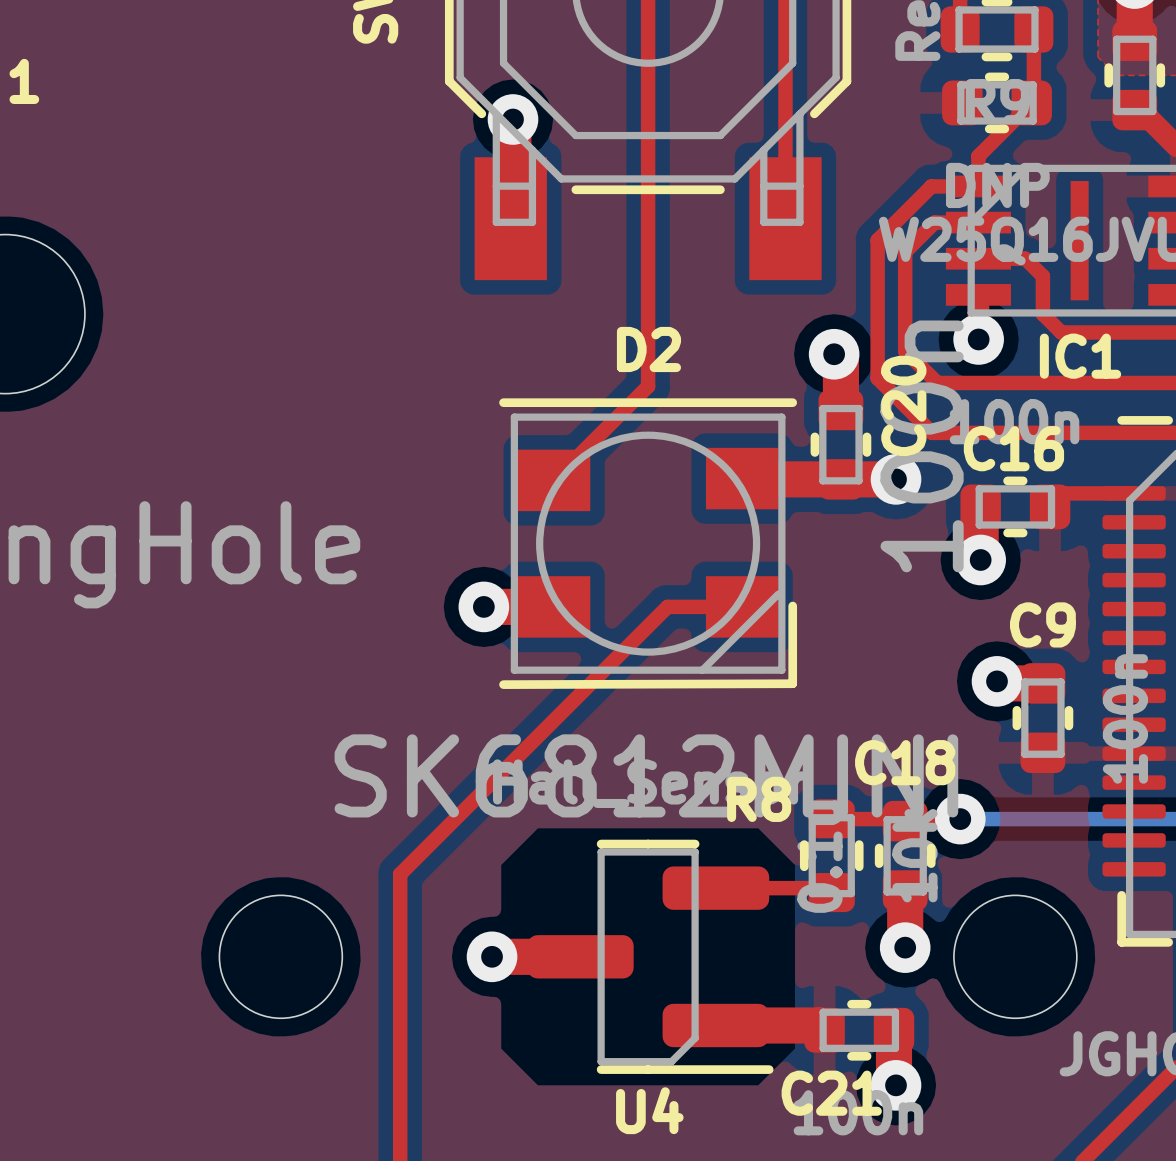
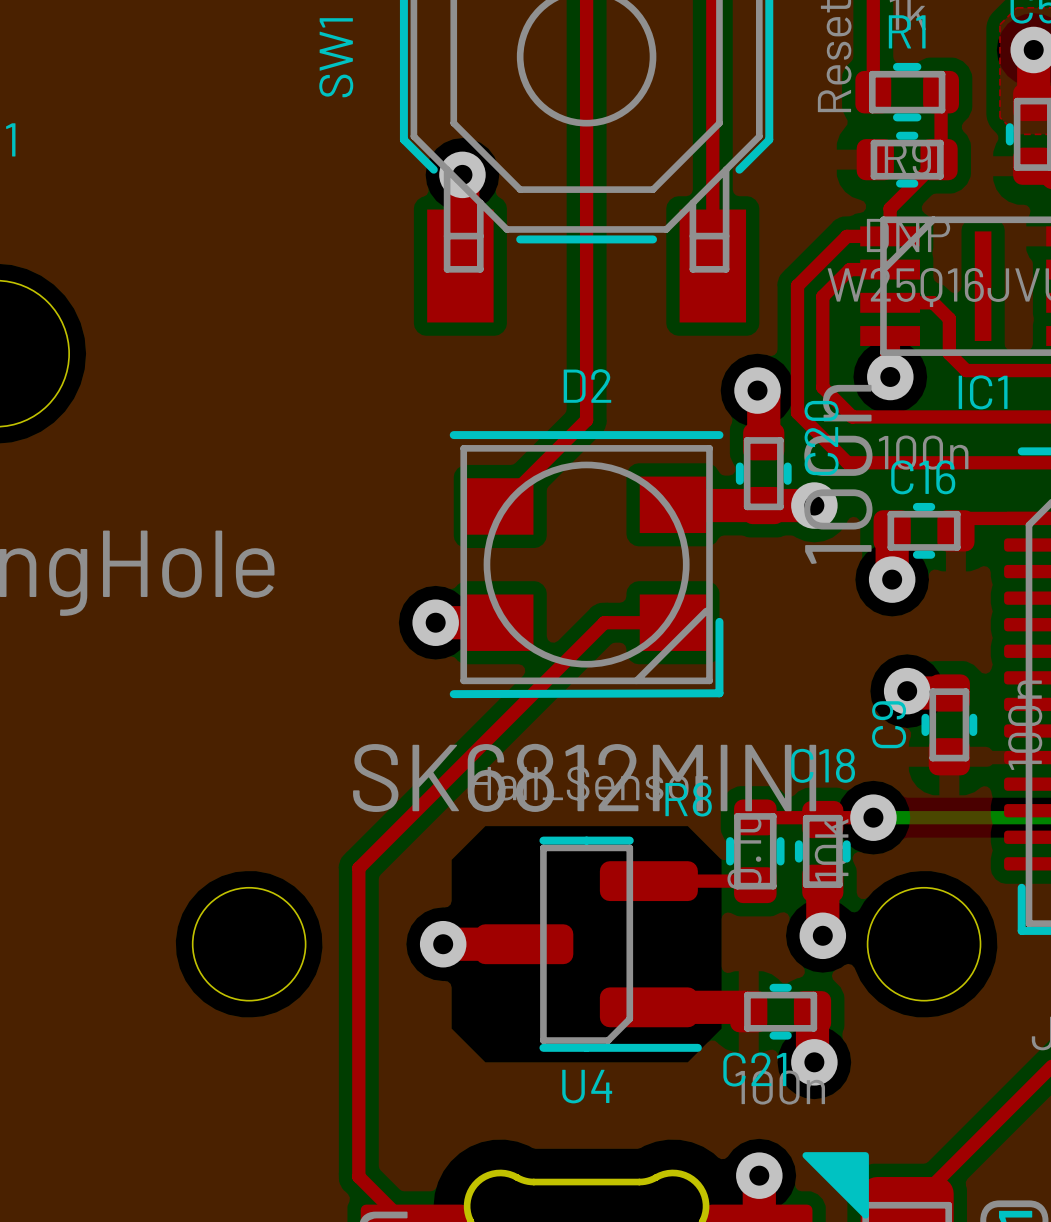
C9 name rotation: 0° (1042, 624) -> 90° counterclockwise (889, 724)
C9 name position: C9 (1042, 624) -> C9 (889, 724)

